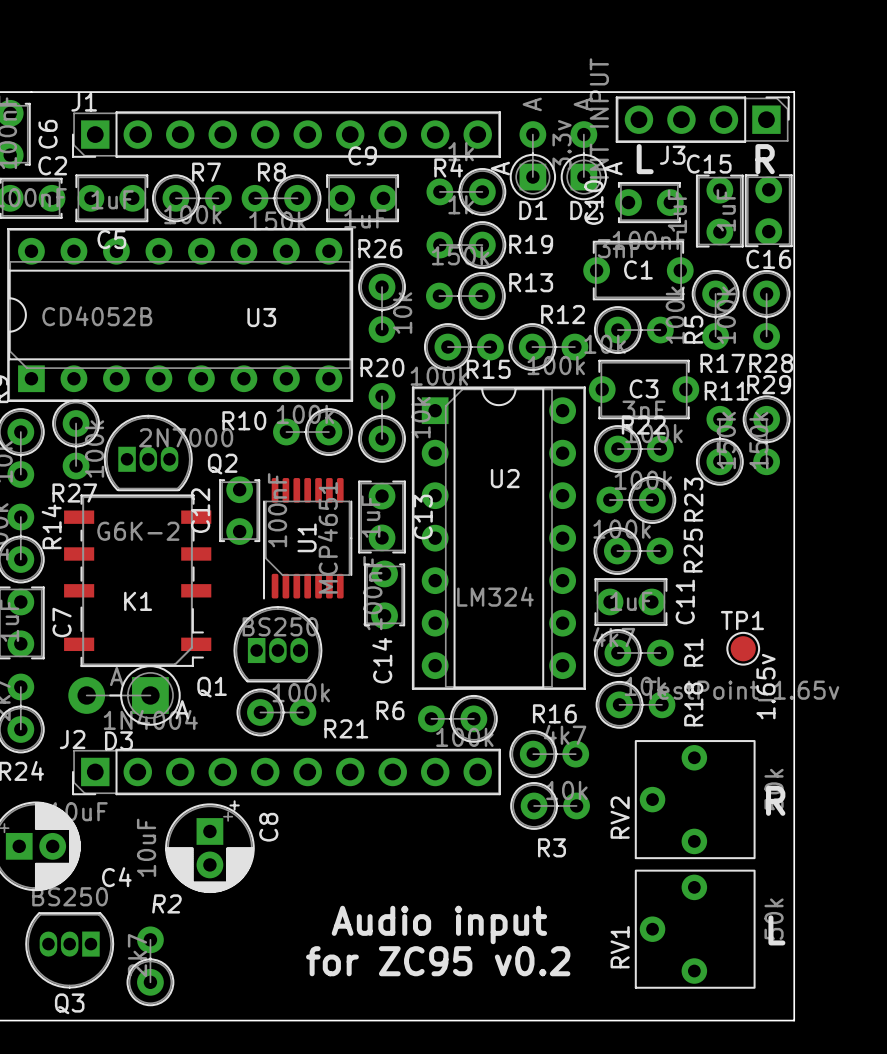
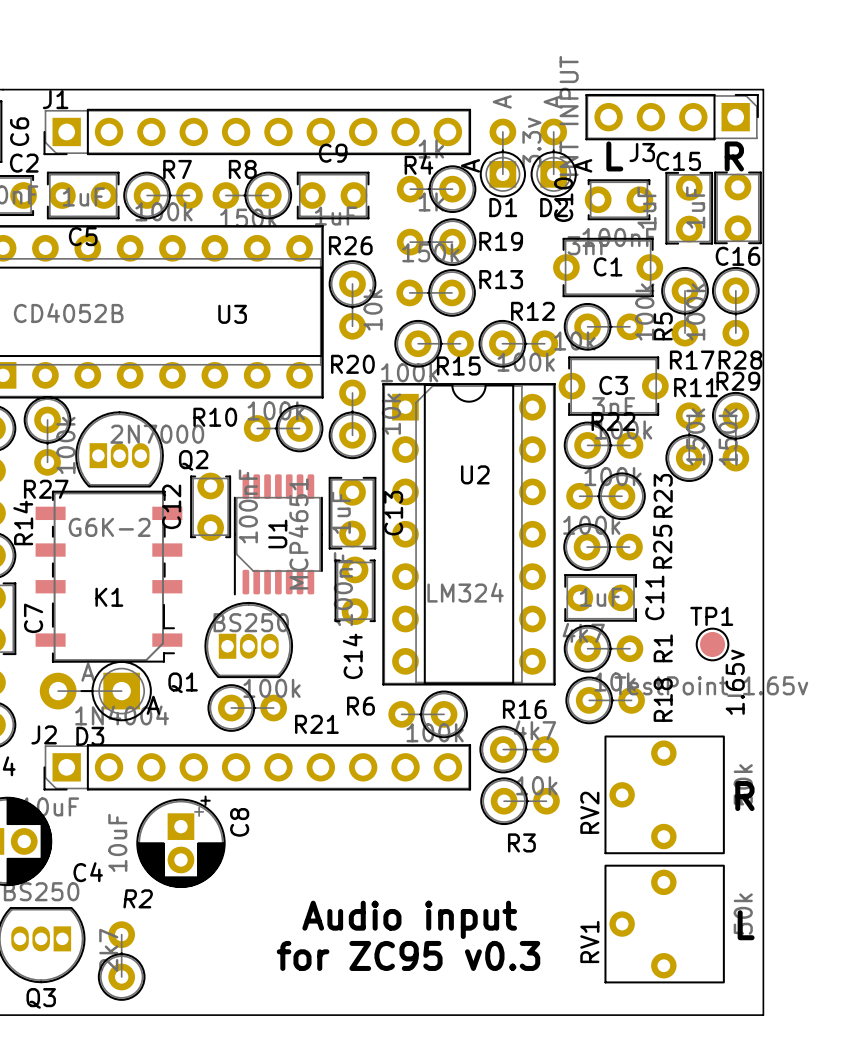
text: for ZC95 v0.2 (438, 961) -> for ZC95 v0.3 (408, 955)

